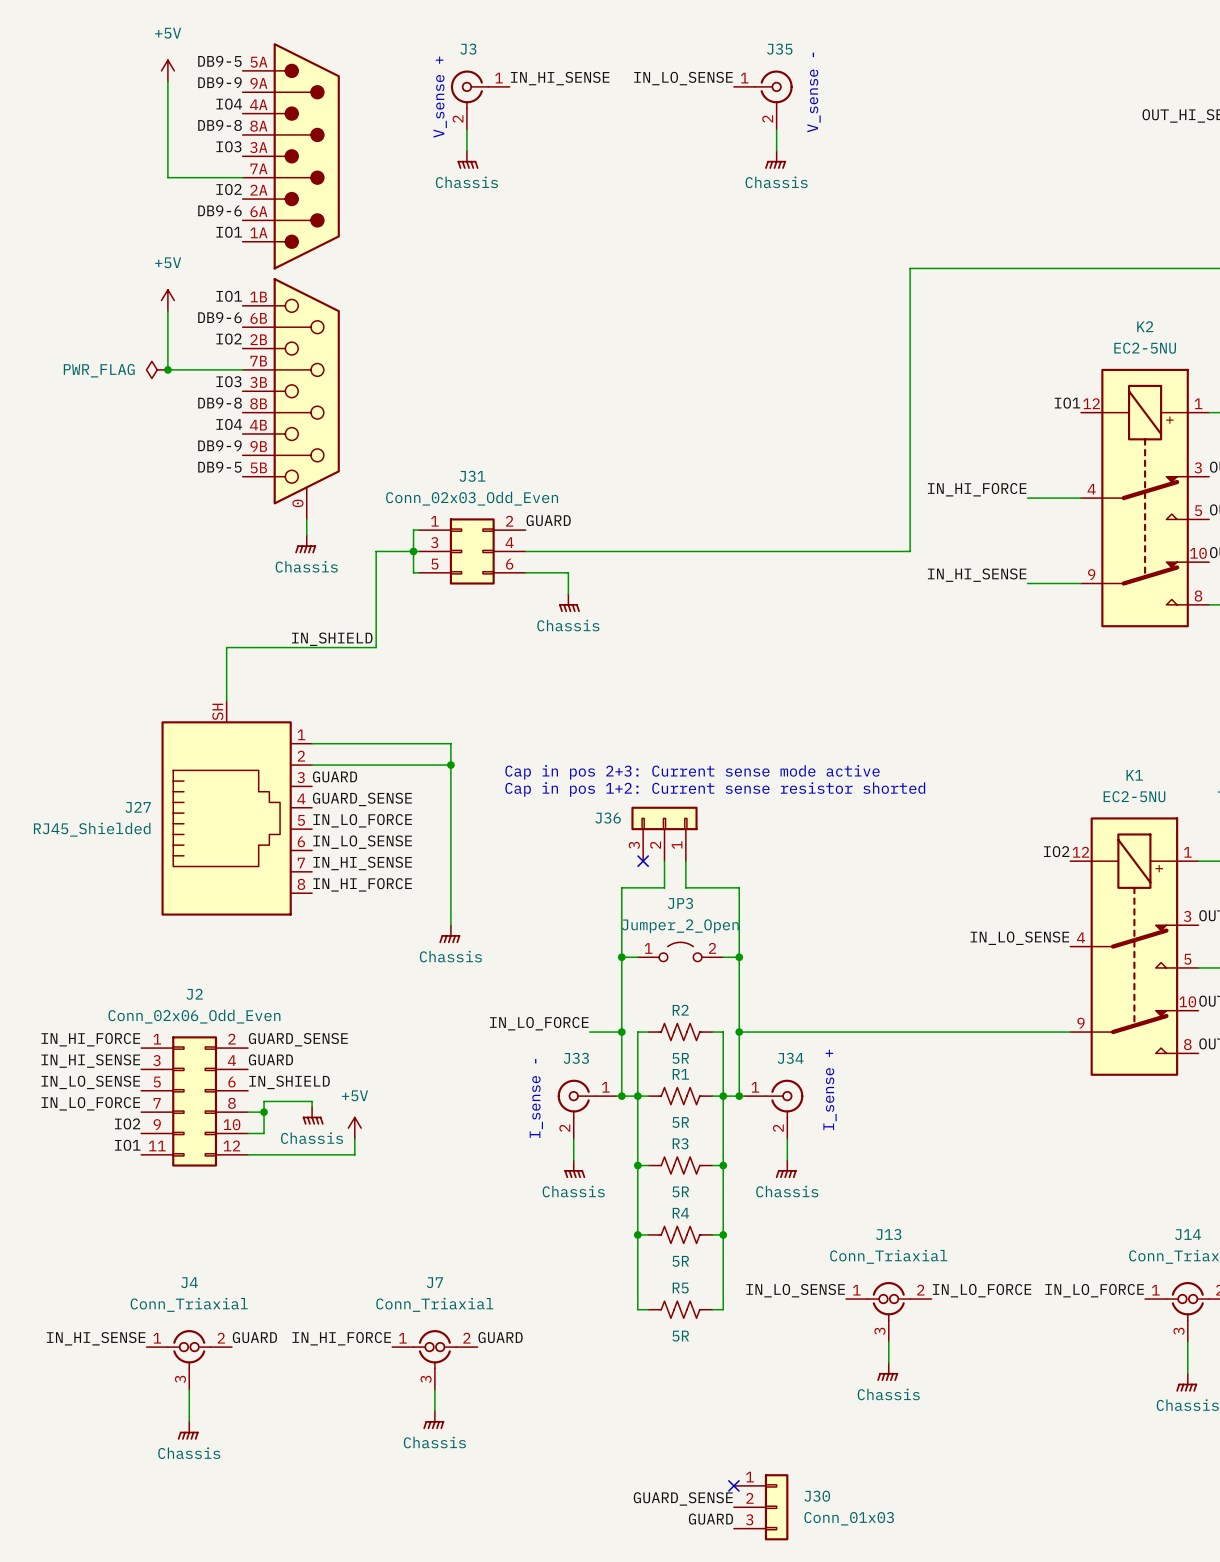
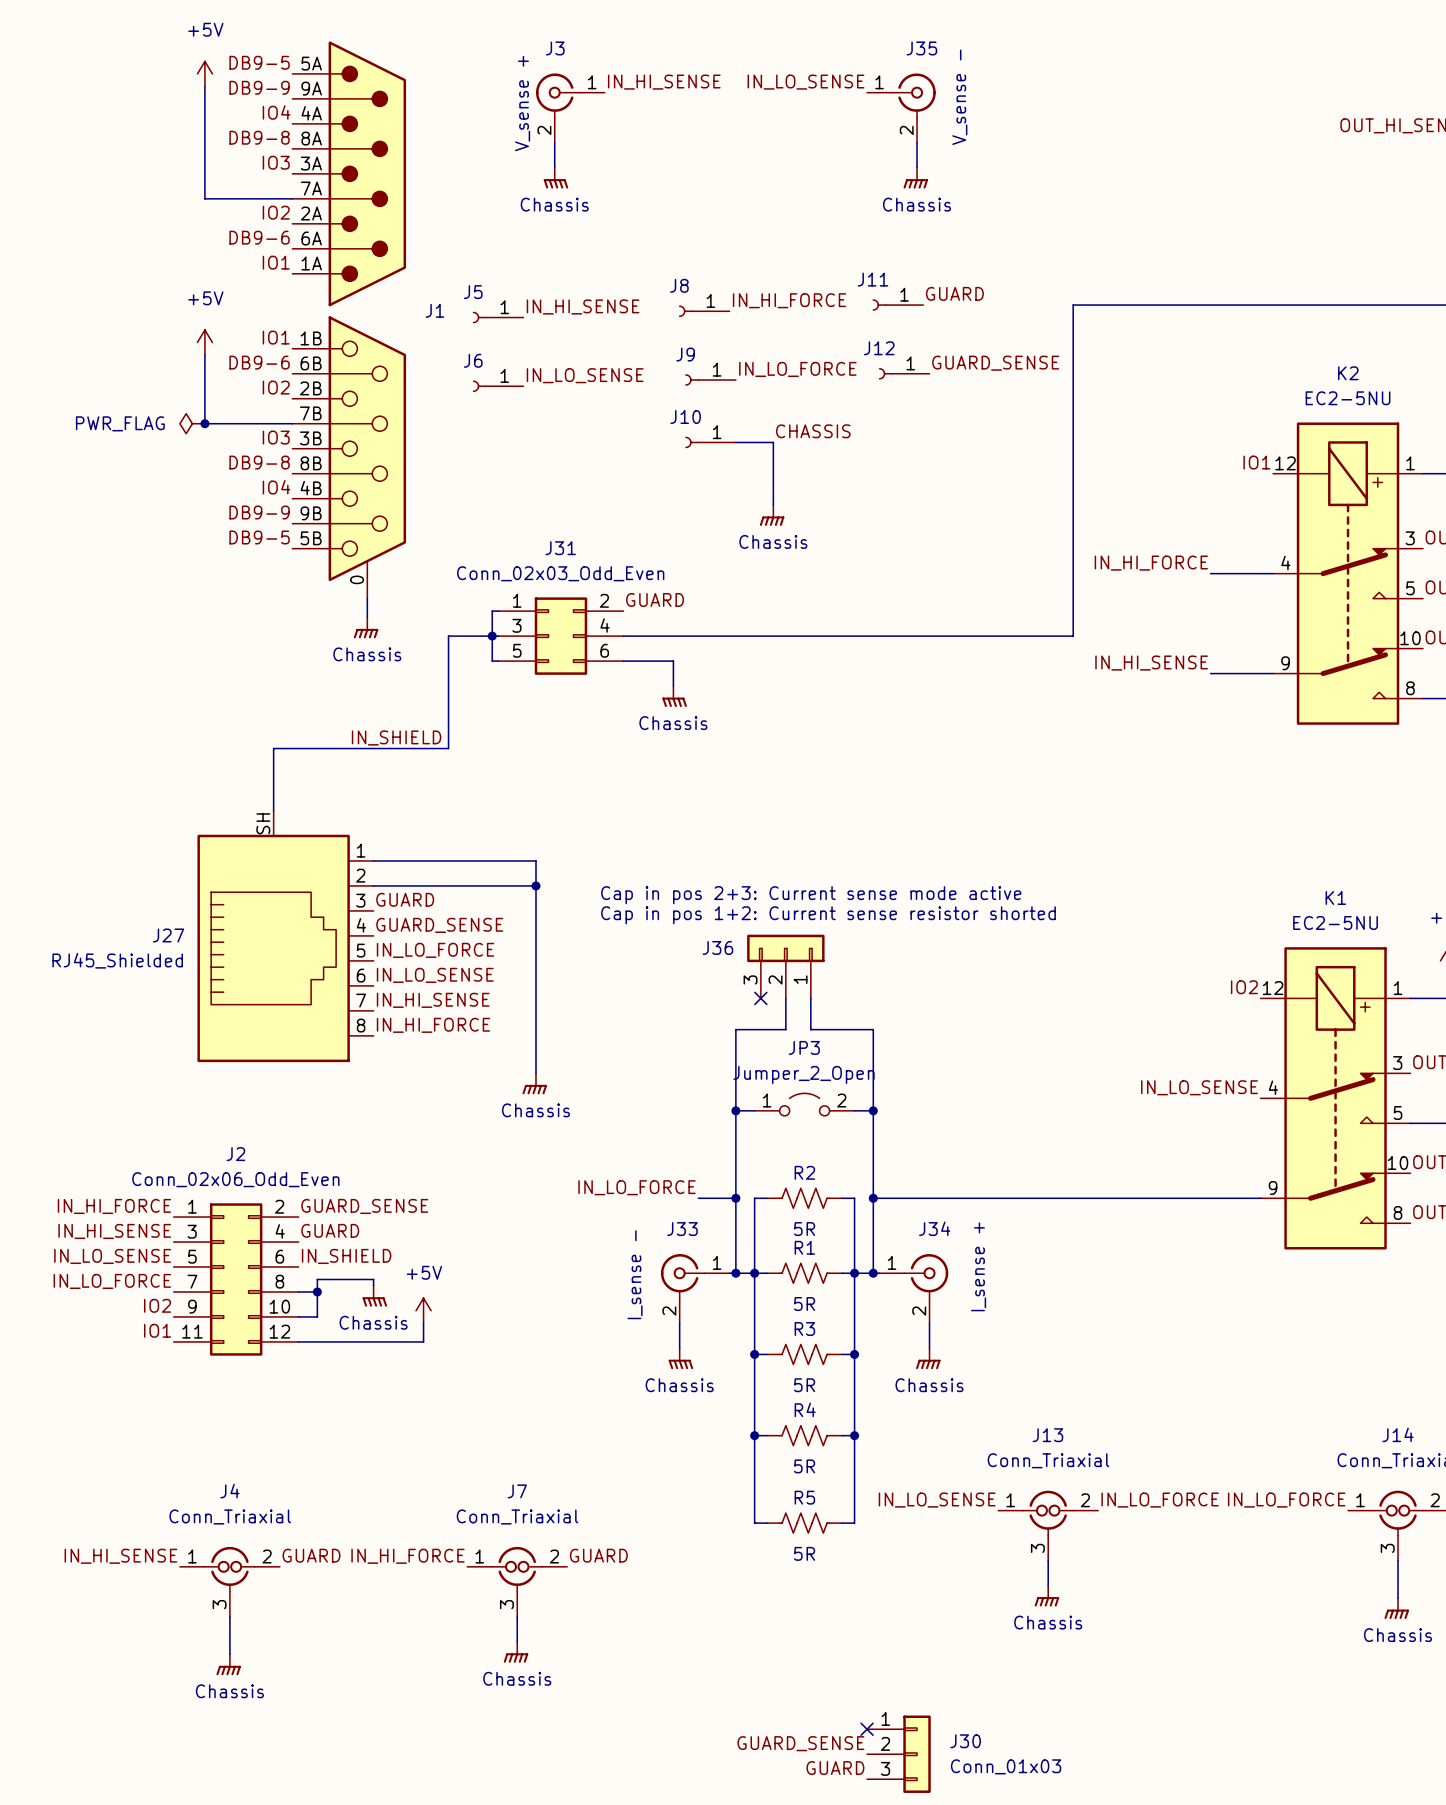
label: none -> GUARD (954, 293)
label: none -> IN_HI_FORCE (789, 300)
J11: none -> (897, 305)
label: none -> IN_HI_SENSE (583, 306)
J1 name: none -> J1 (434, 310)
J8: none -> (704, 311)
J5: none -> (498, 317)
label: none -> GUARD_SENSE (995, 363)
label: none -> IN_LO_FORCE (797, 369)
J12: none -> (904, 373)
label: none -> IN_LO_SENSE (585, 375)
J9: none -> (710, 380)
J6: none -> (498, 386)
label: none -> CHASSIS (813, 431)
J10: none -> (710, 442)
wire: none -> (735, 442) (773, 442) (773, 504)
power symbol: none -> (772, 515)

